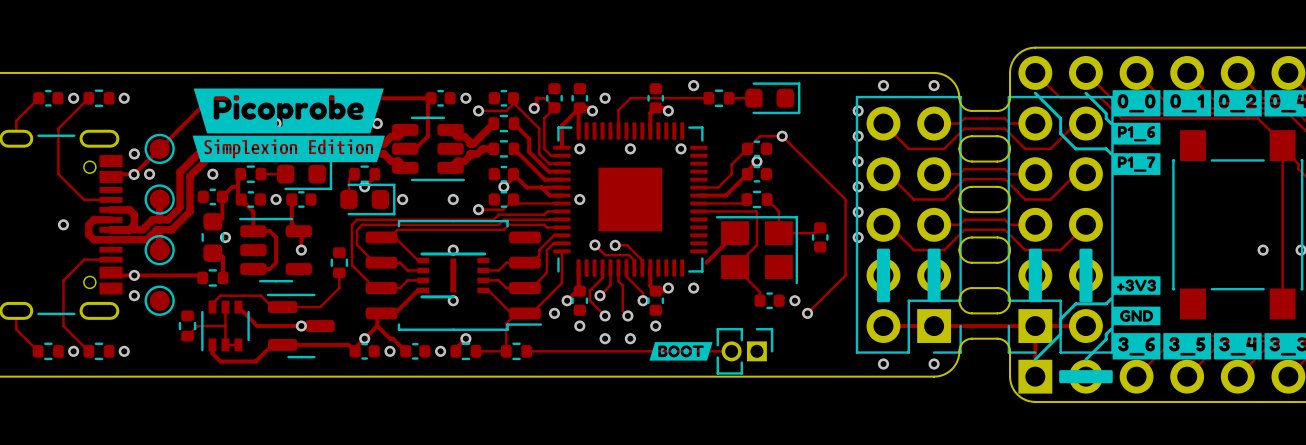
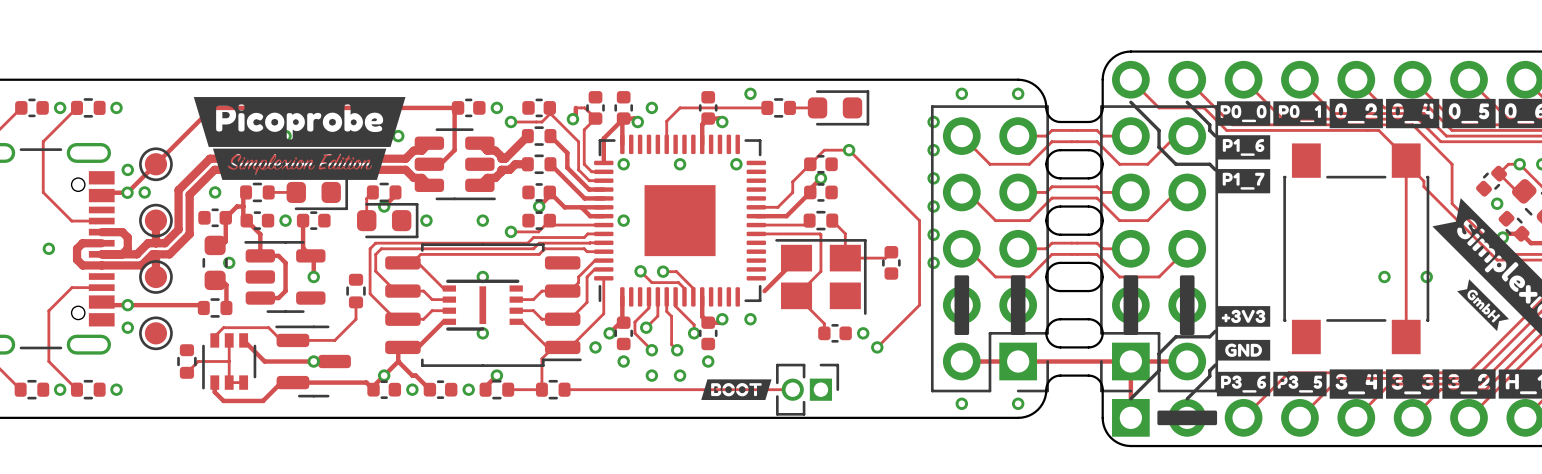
drawing shape: [1112, 90, 1161, 117] -> [1216, 101, 1271, 126]
drawing shape: [1163, 90, 1212, 117] -> [1273, 101, 1327, 126]
drawing shape: [192, 135, 385, 163] -> [212, 148, 387, 180]
drawing shape: [1112, 333, 1161, 360] -> [1216, 371, 1271, 397]
drawing shape: [1163, 333, 1212, 360] -> [1273, 371, 1327, 397]

